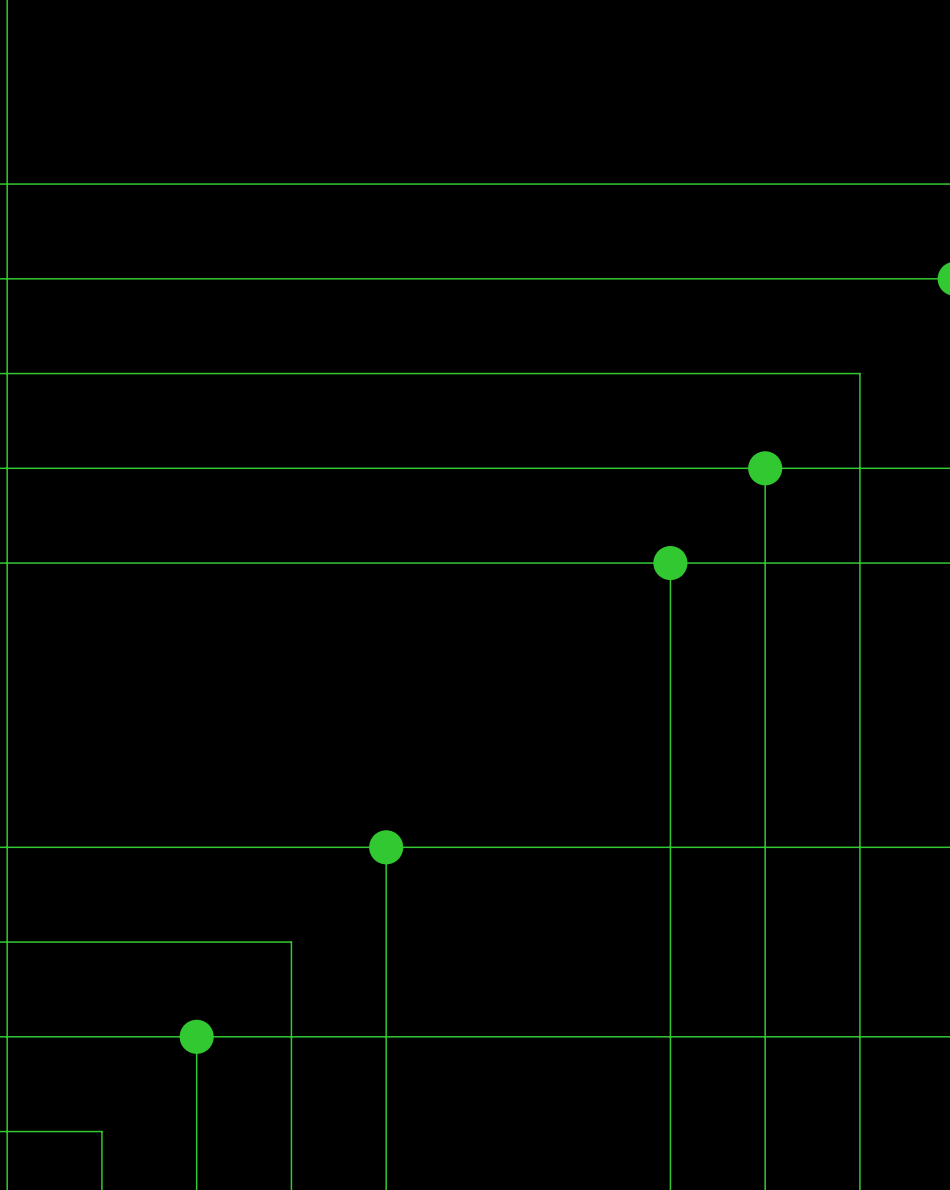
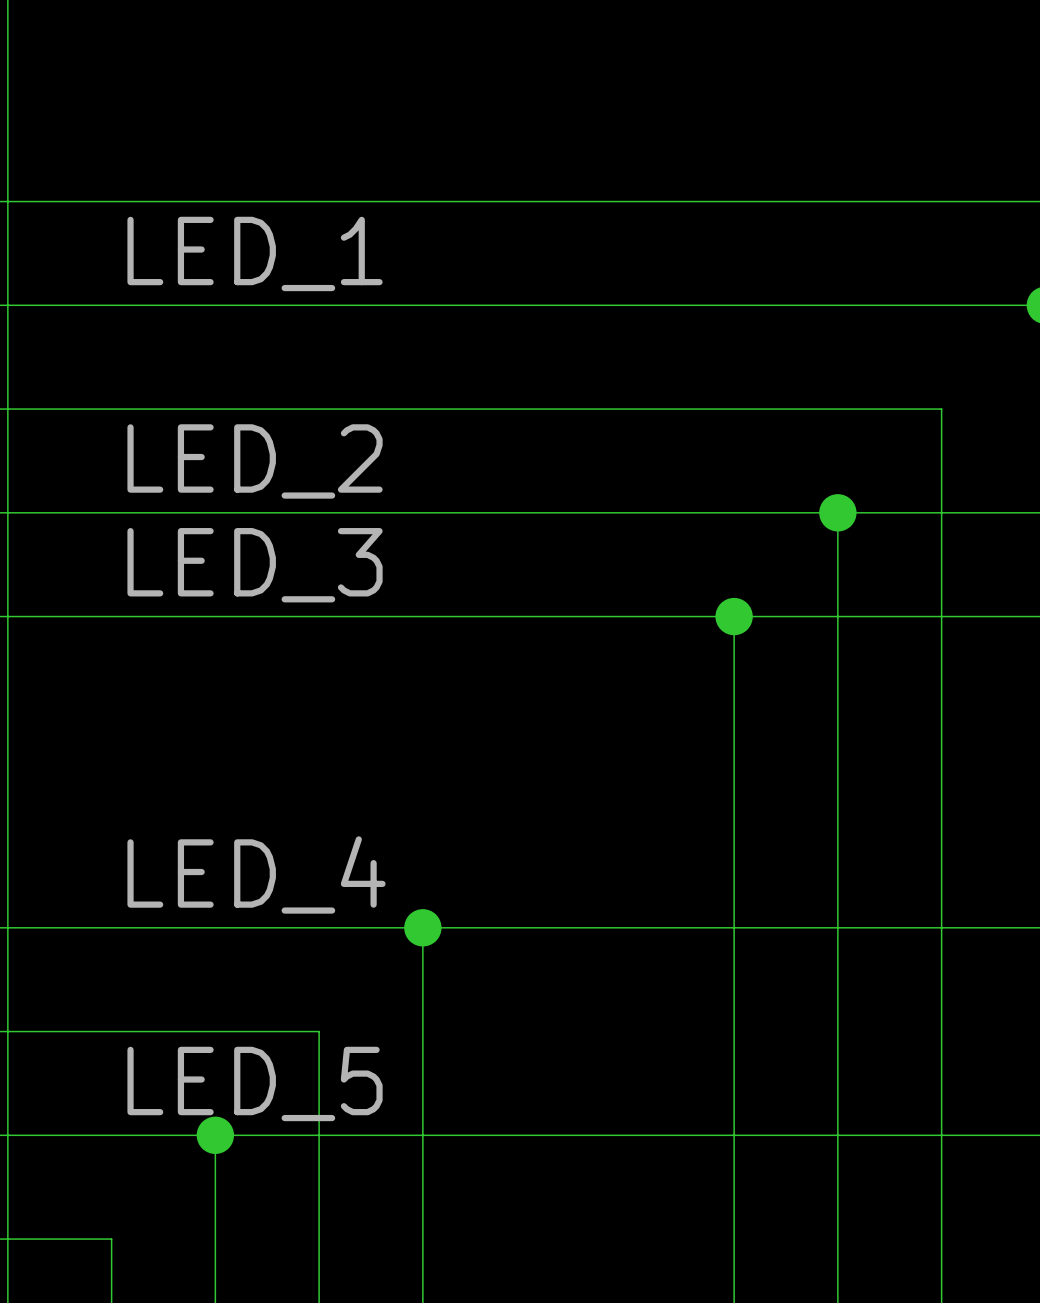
label: none -> LED_1 (255, 253)
label: none -> LED_2 (255, 461)
label: none -> LED_3 (255, 565)
label: none -> LED_4 (256, 874)
label: none -> LED_5 (255, 1083)

